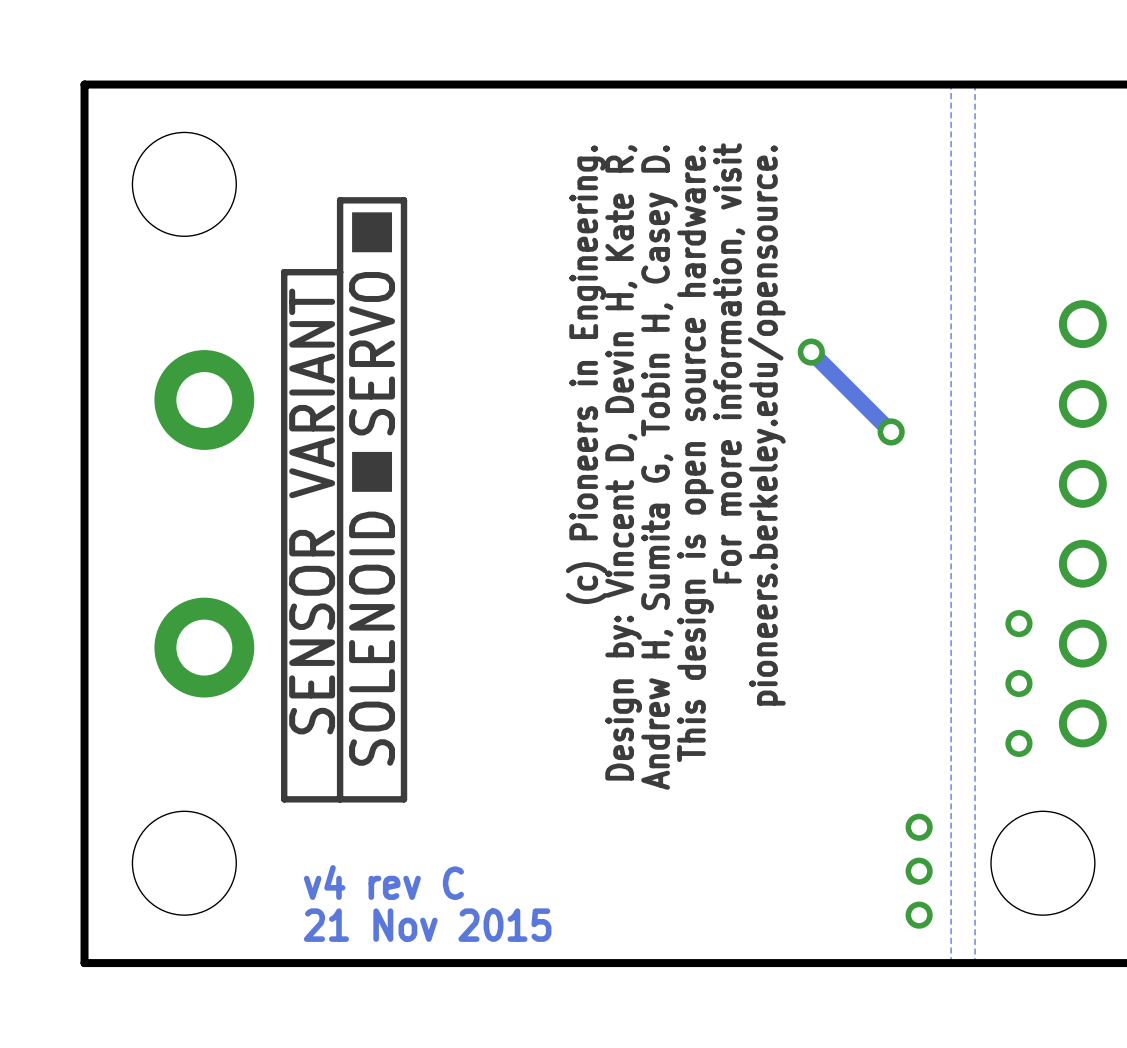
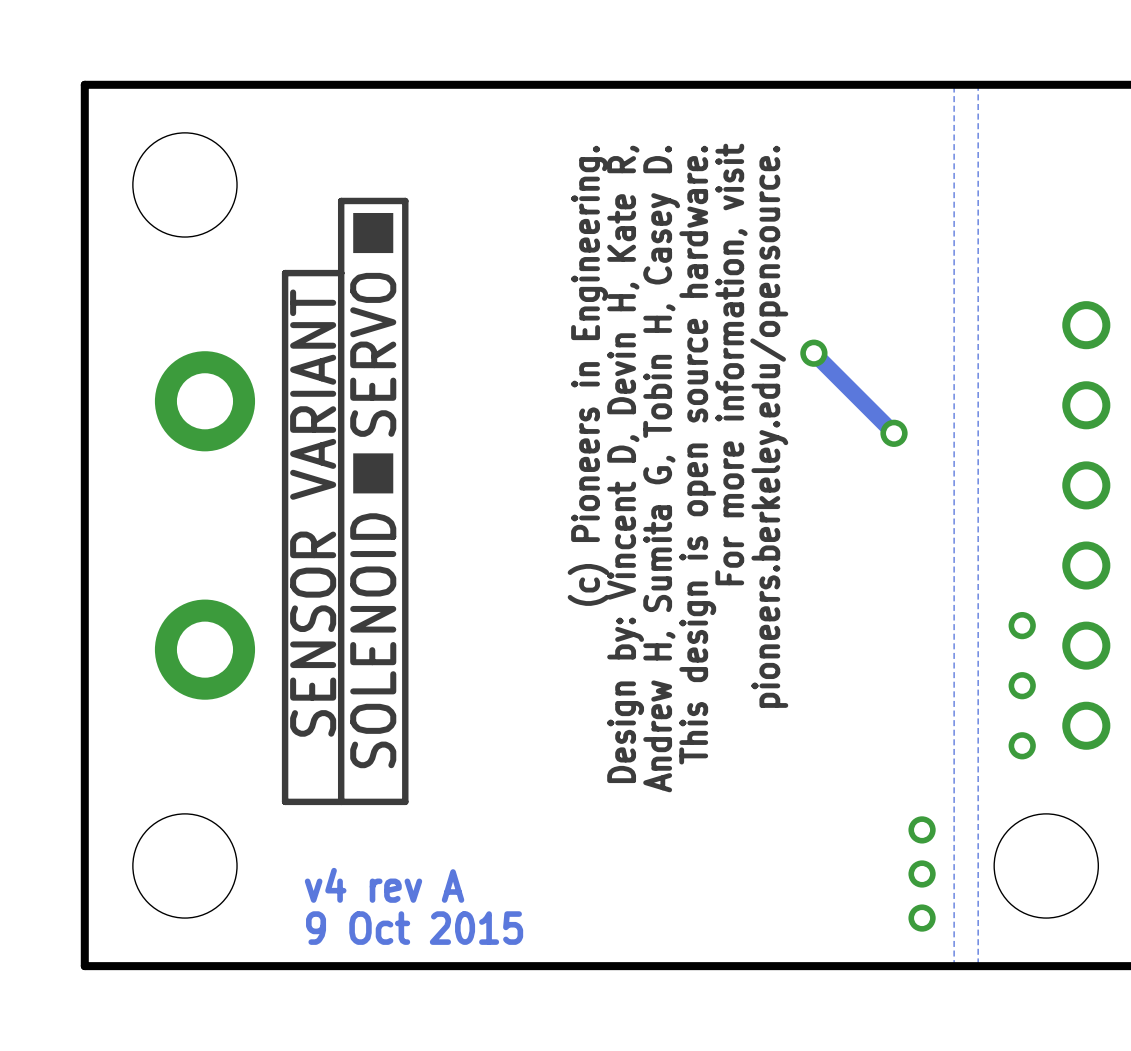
text: v4 rev C (383, 882) -> v4 rev A (384, 885)
text: 21 Nov 2015 (427, 925) -> 9 Oct 2015 (414, 928)

